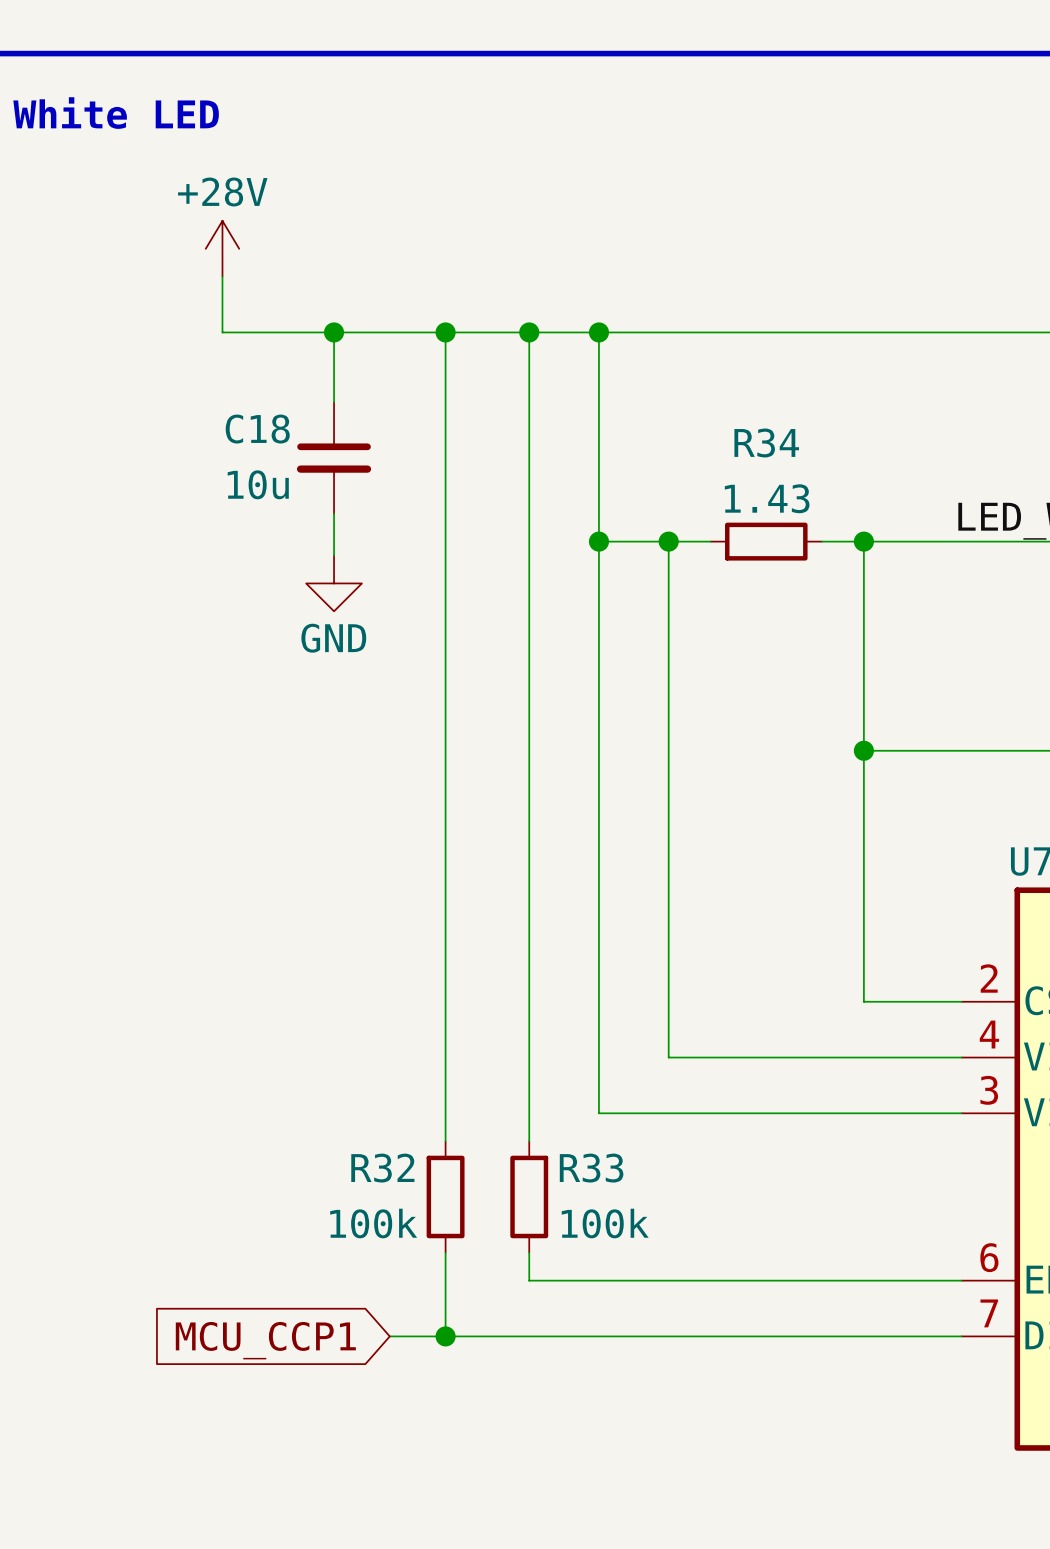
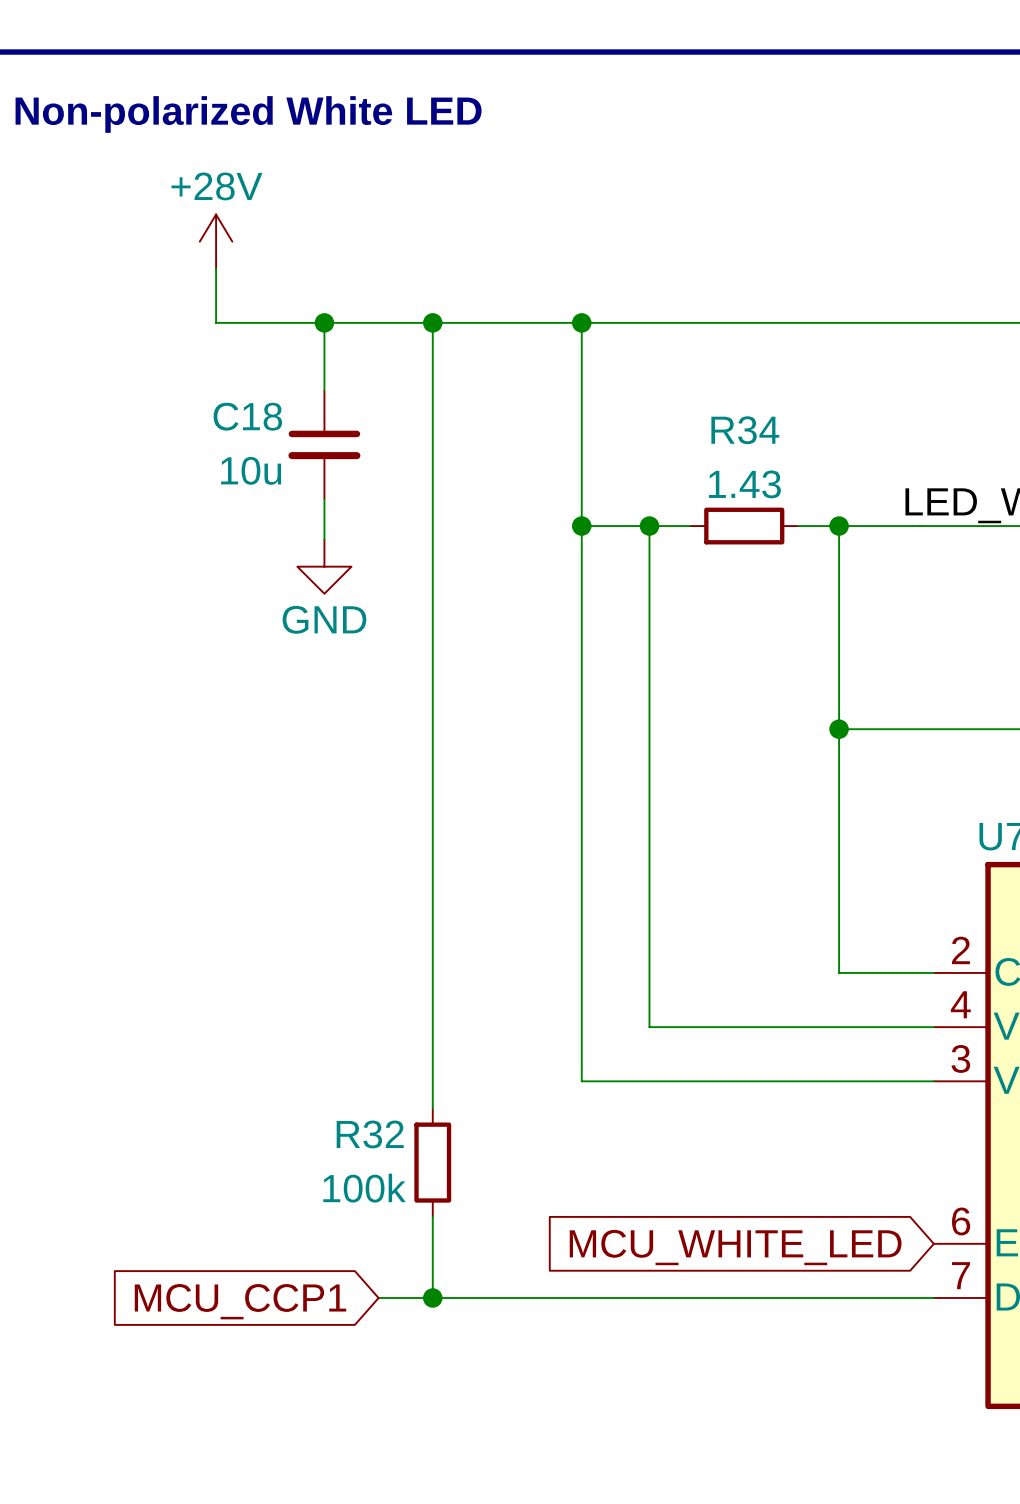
text: White LED (116, 113) -> Non-polarized White LED (248, 114)
wire: (529, 332) (529, 1141) -> none
junction: (529, 332) -> none
R33: 100k (529, 1196) -> none
wire: (529, 1252) (529, 1280) (961, 1280) -> none
global label: none -> MCU_WHITE_LED (735, 1247)

